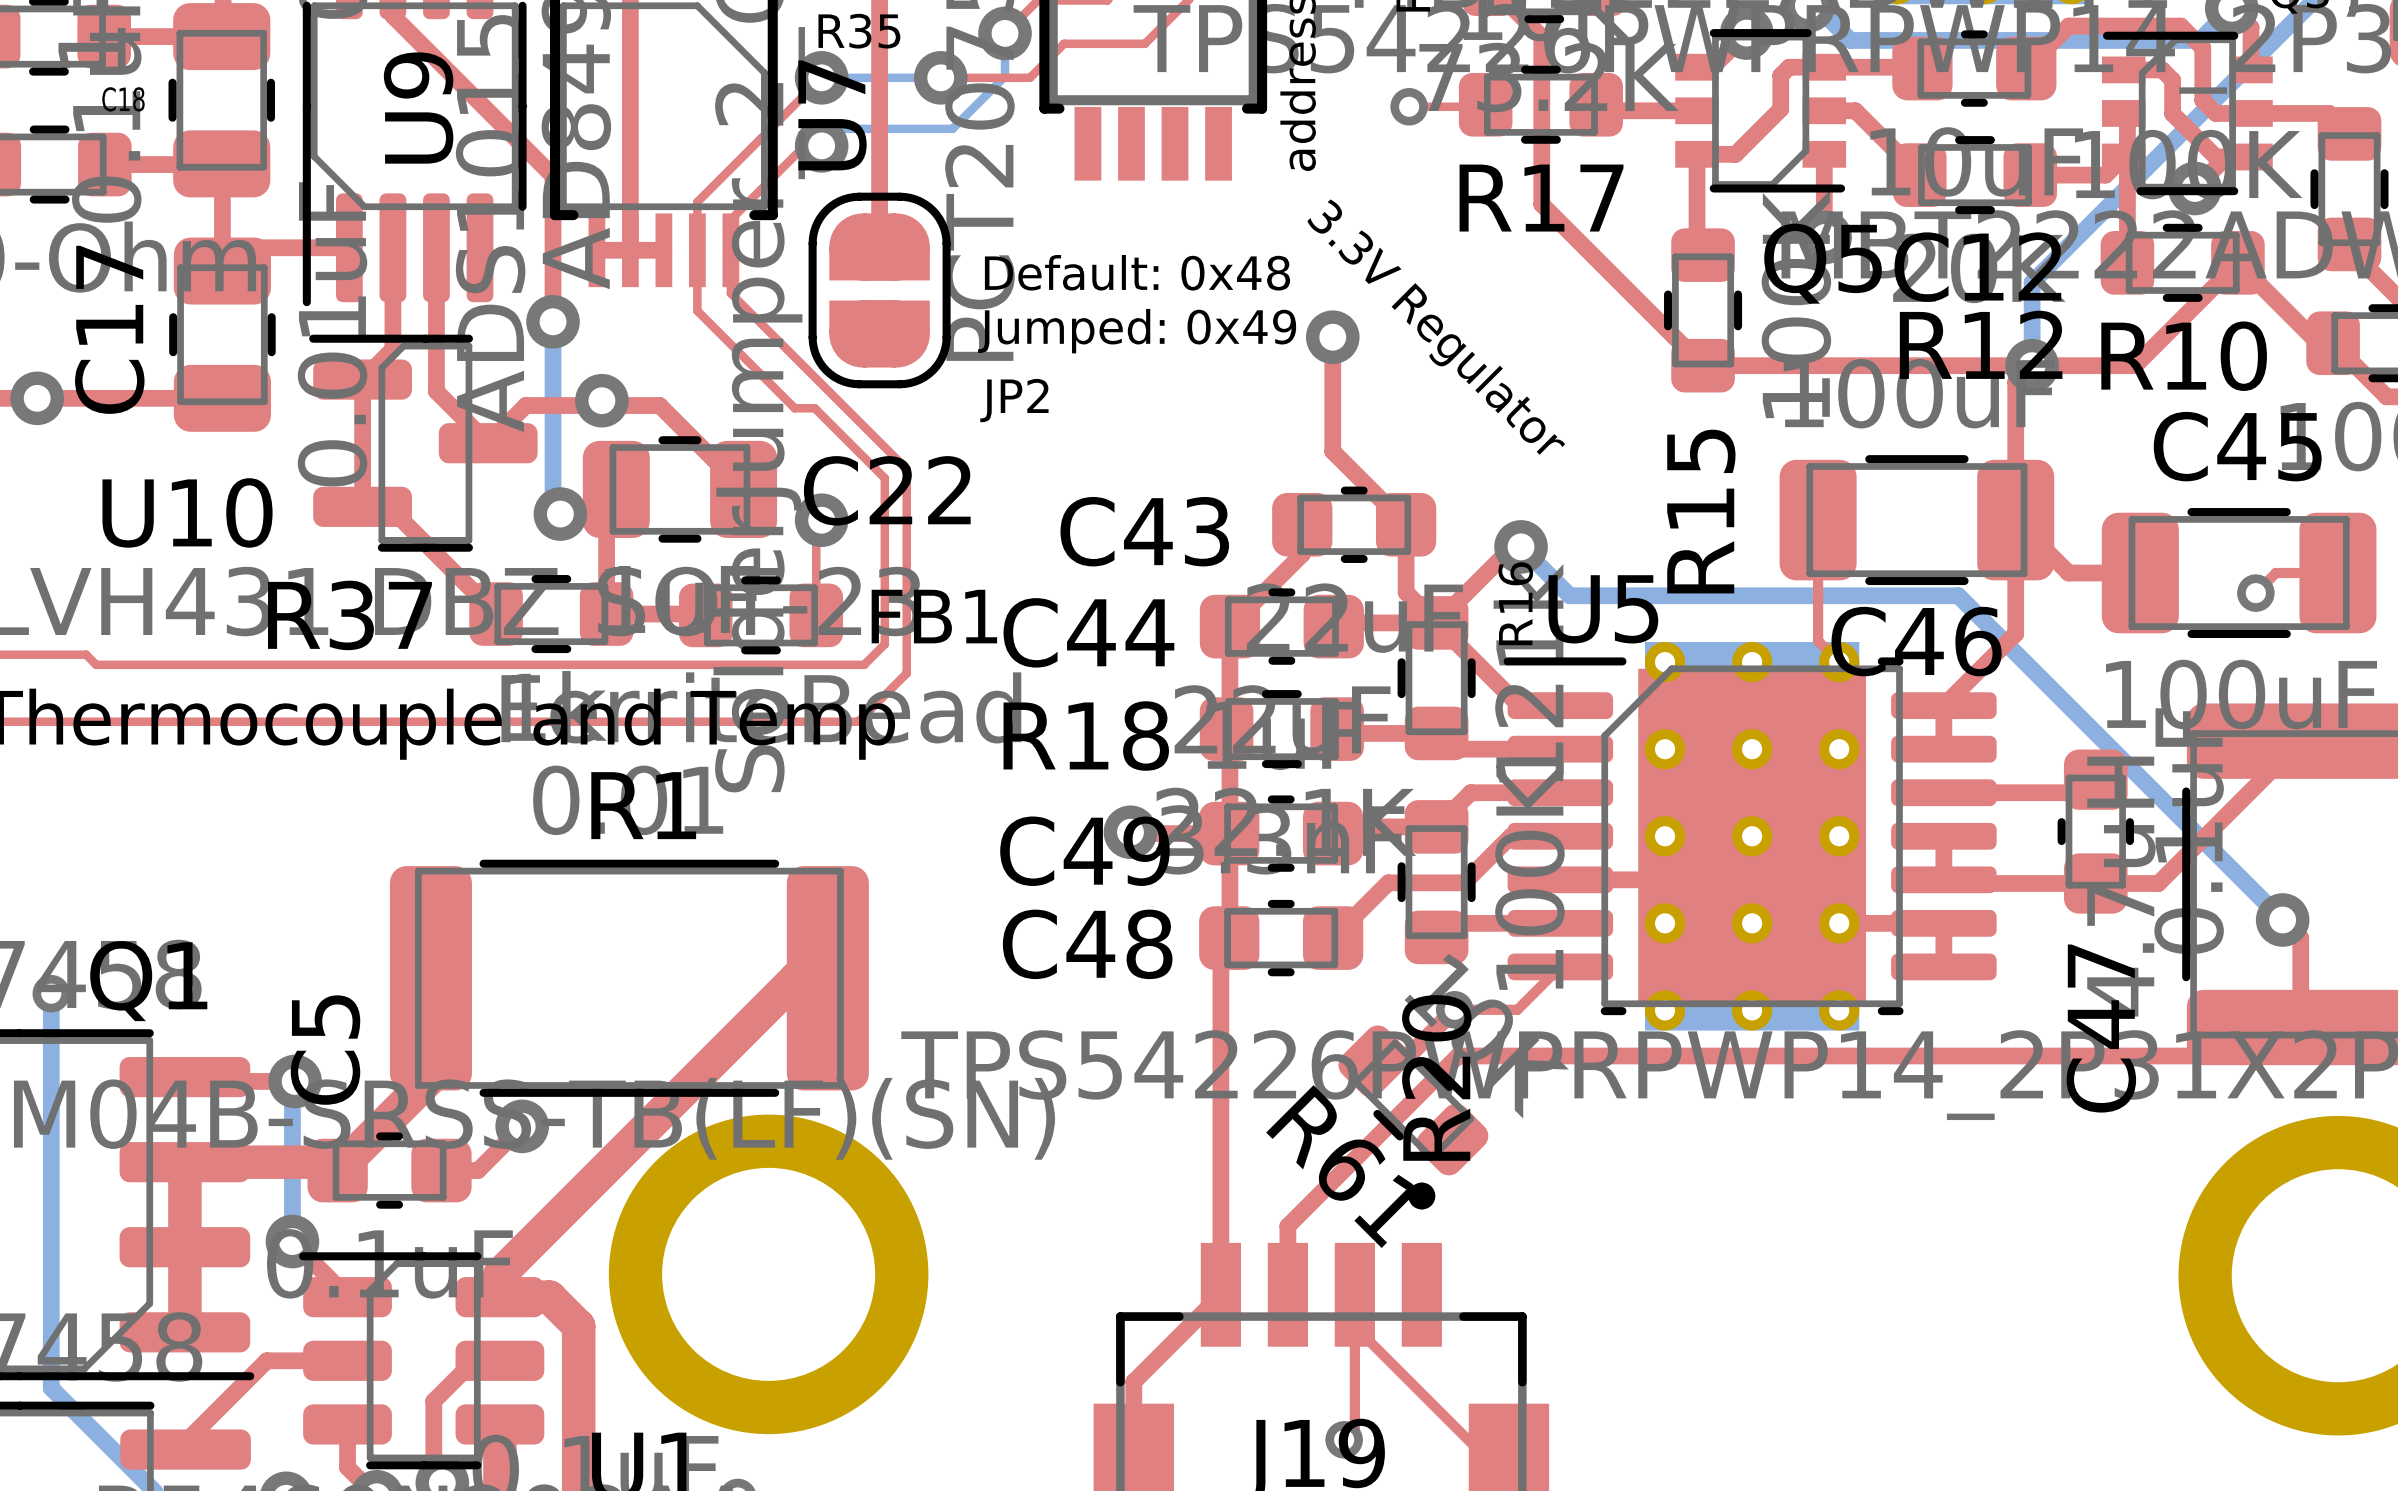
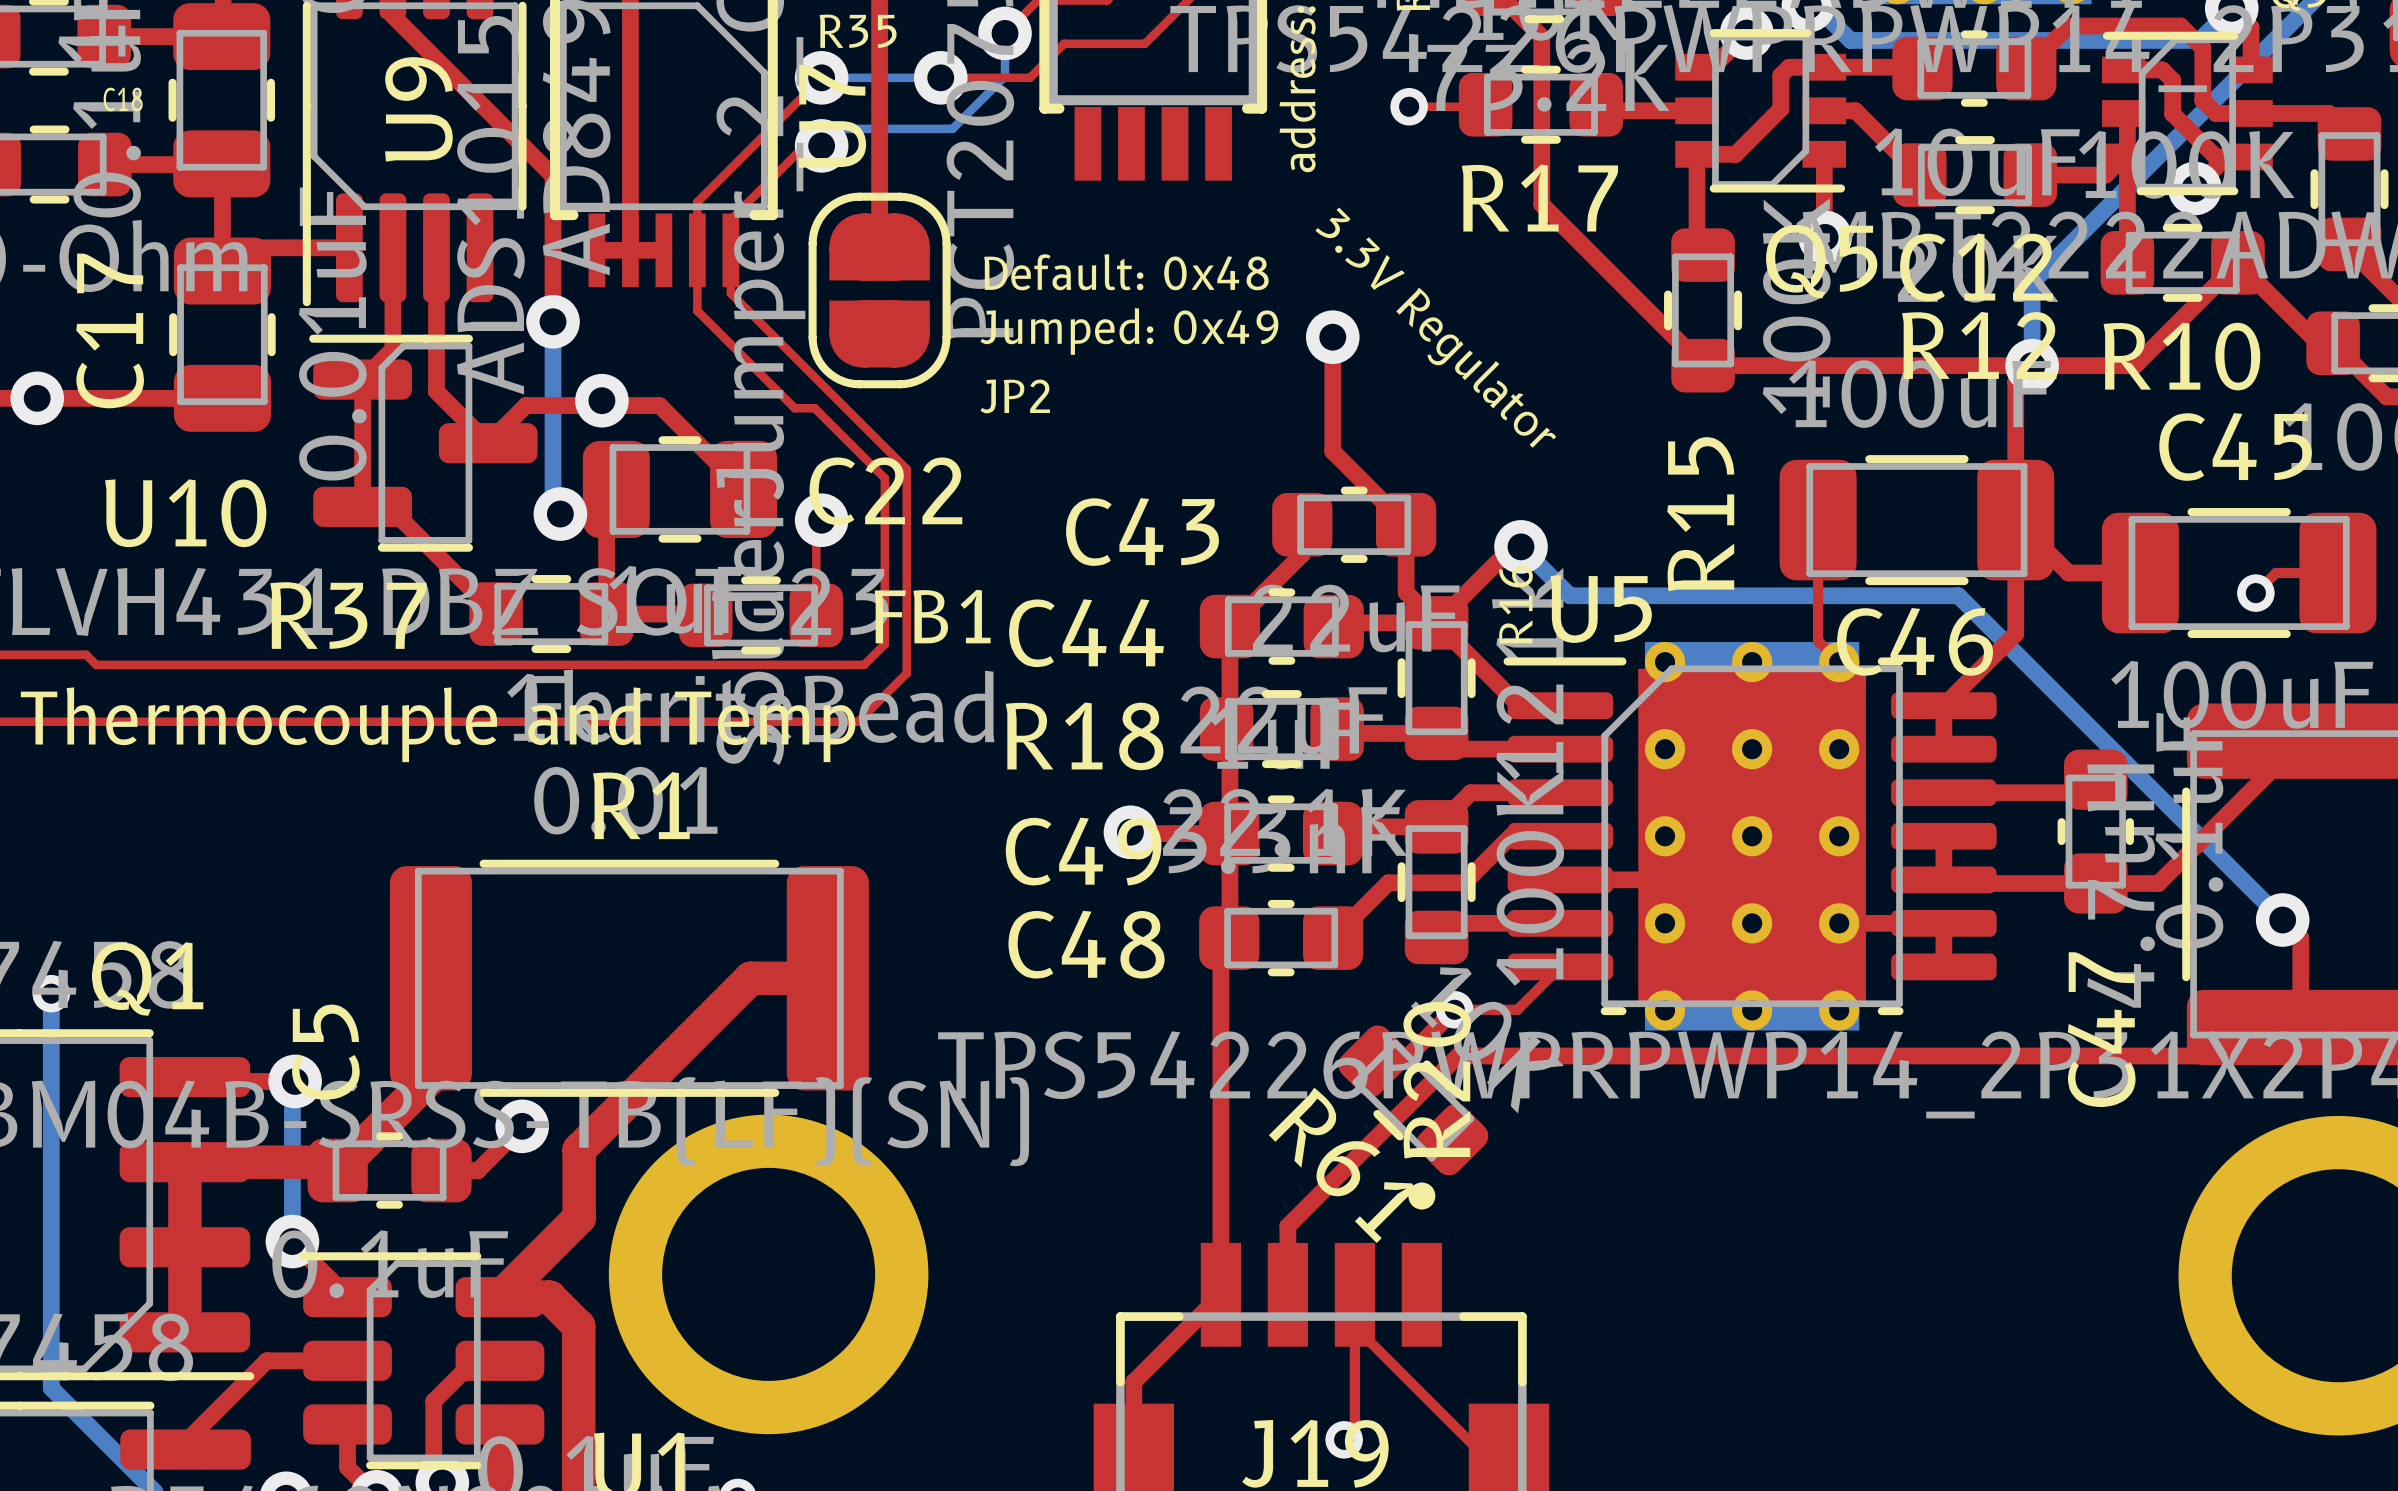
top track: (796, 978) (499, 1274) (499, 1297) -> (796, 978) (750, 978) (579, 1149) (579, 1217) (499, 1297)

